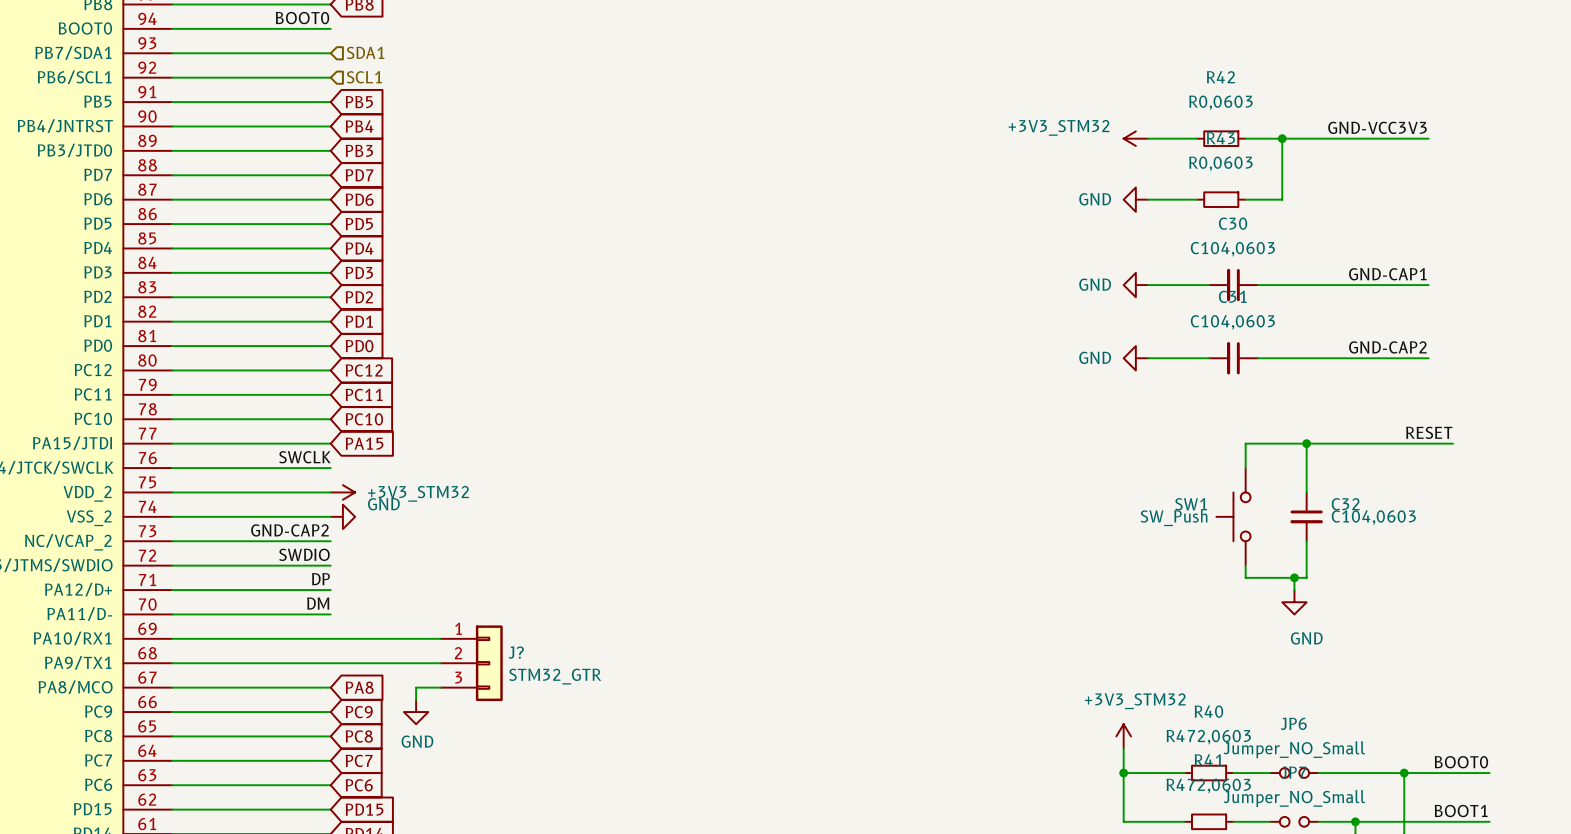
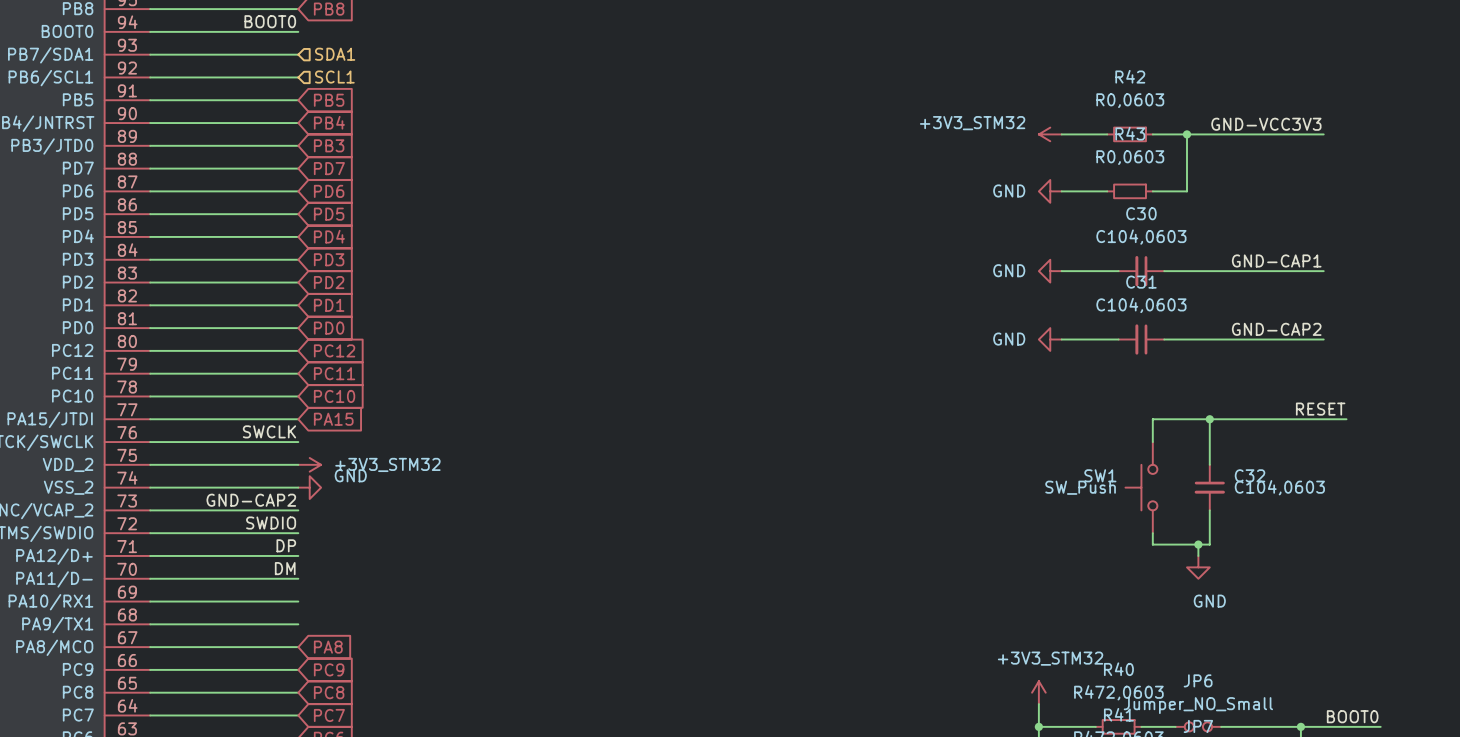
wire: (330, 638) (440, 638) -> none
wire: (330, 663) (440, 663) -> none
J?: STM32_GTR (471, 663) -> none
wire: (440, 687) (416, 687) (416, 699) -> none
power symbol: GND (416, 712) -> none

